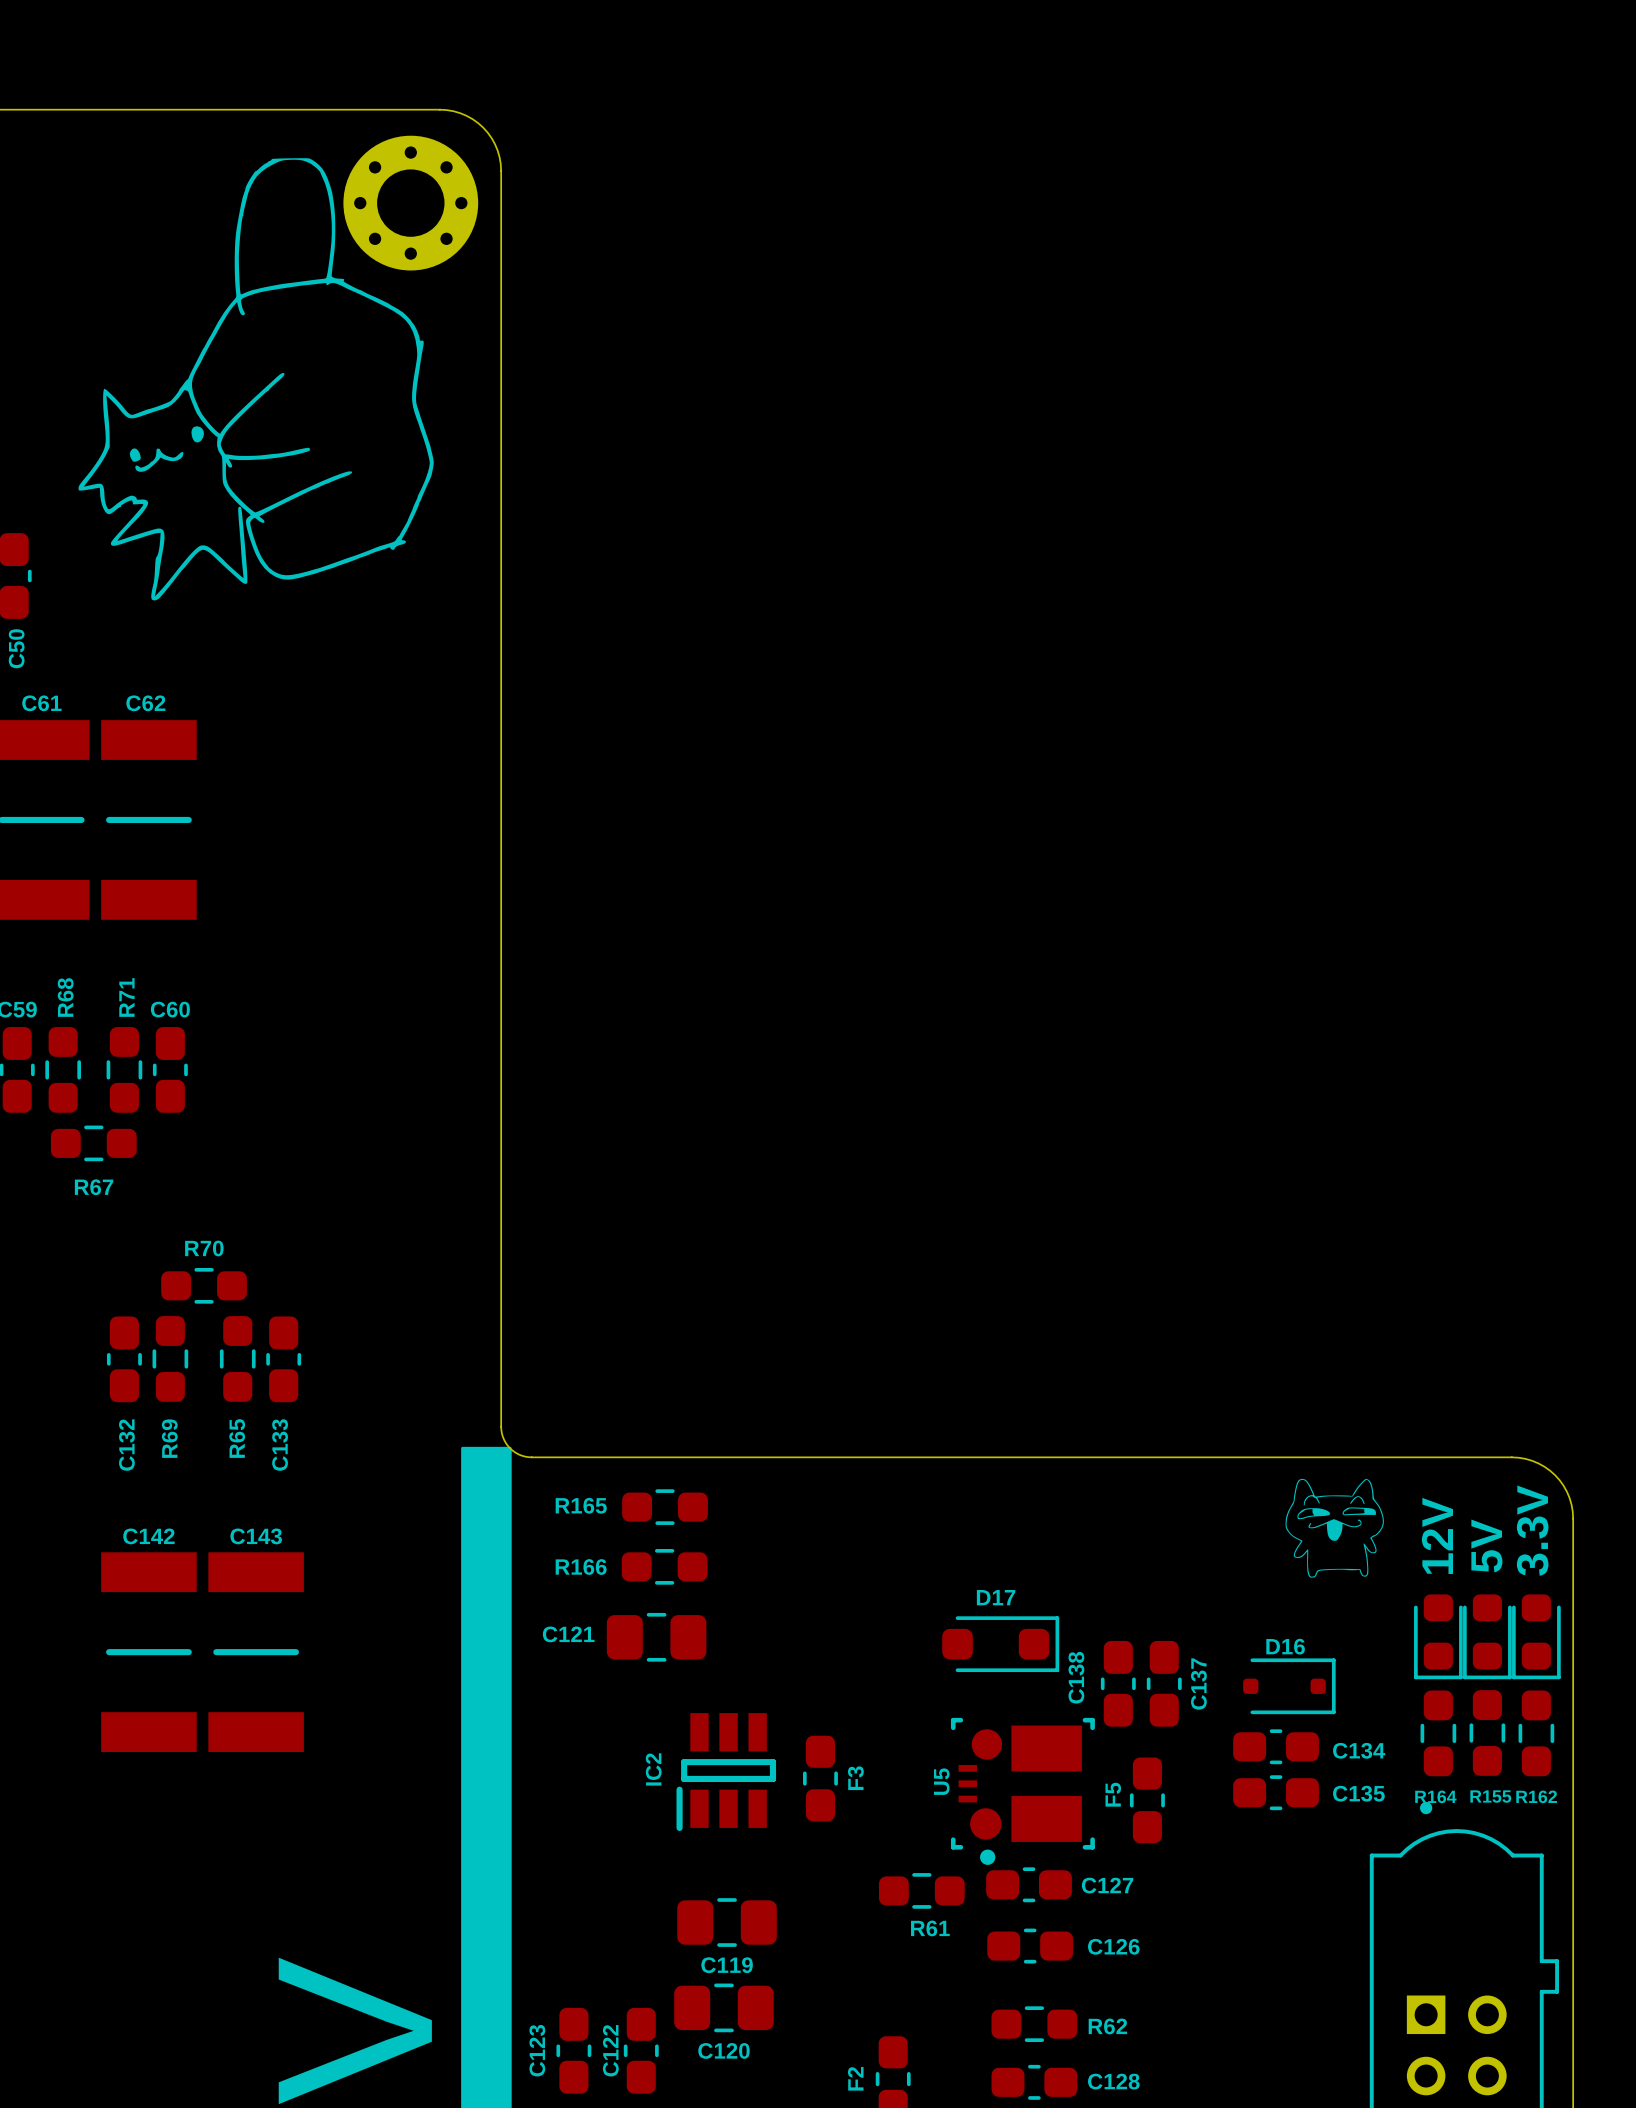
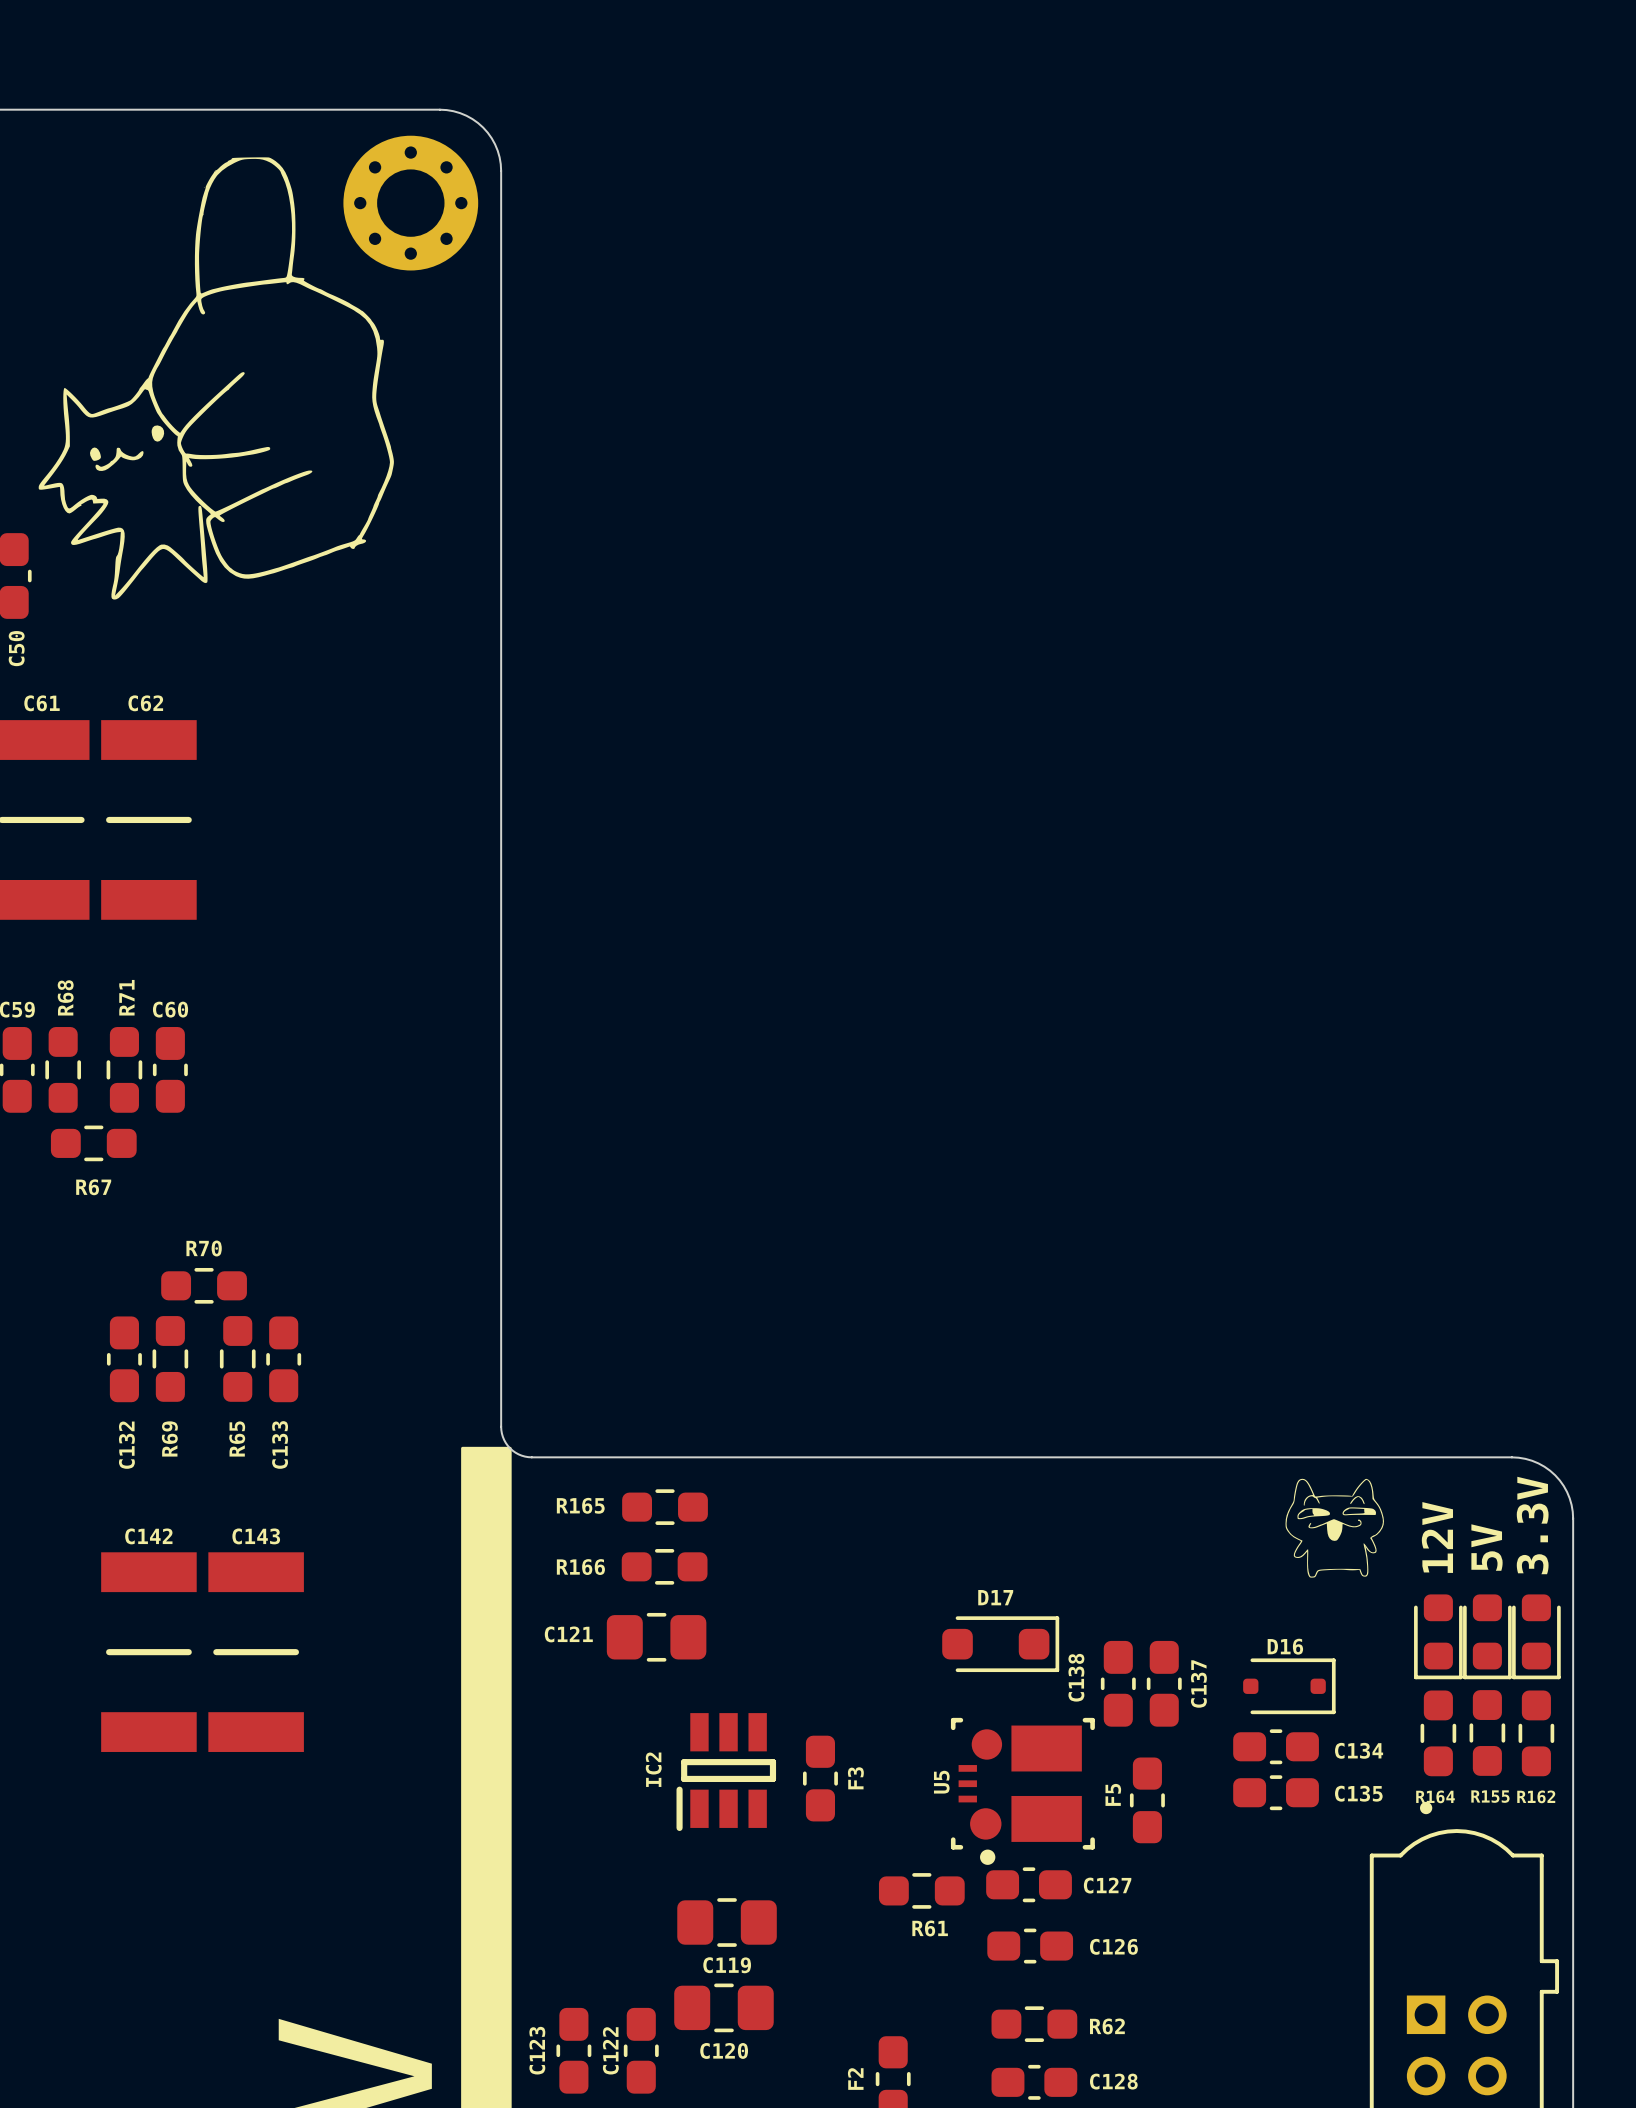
drawing position: (256, 379) -> (216, 378)

